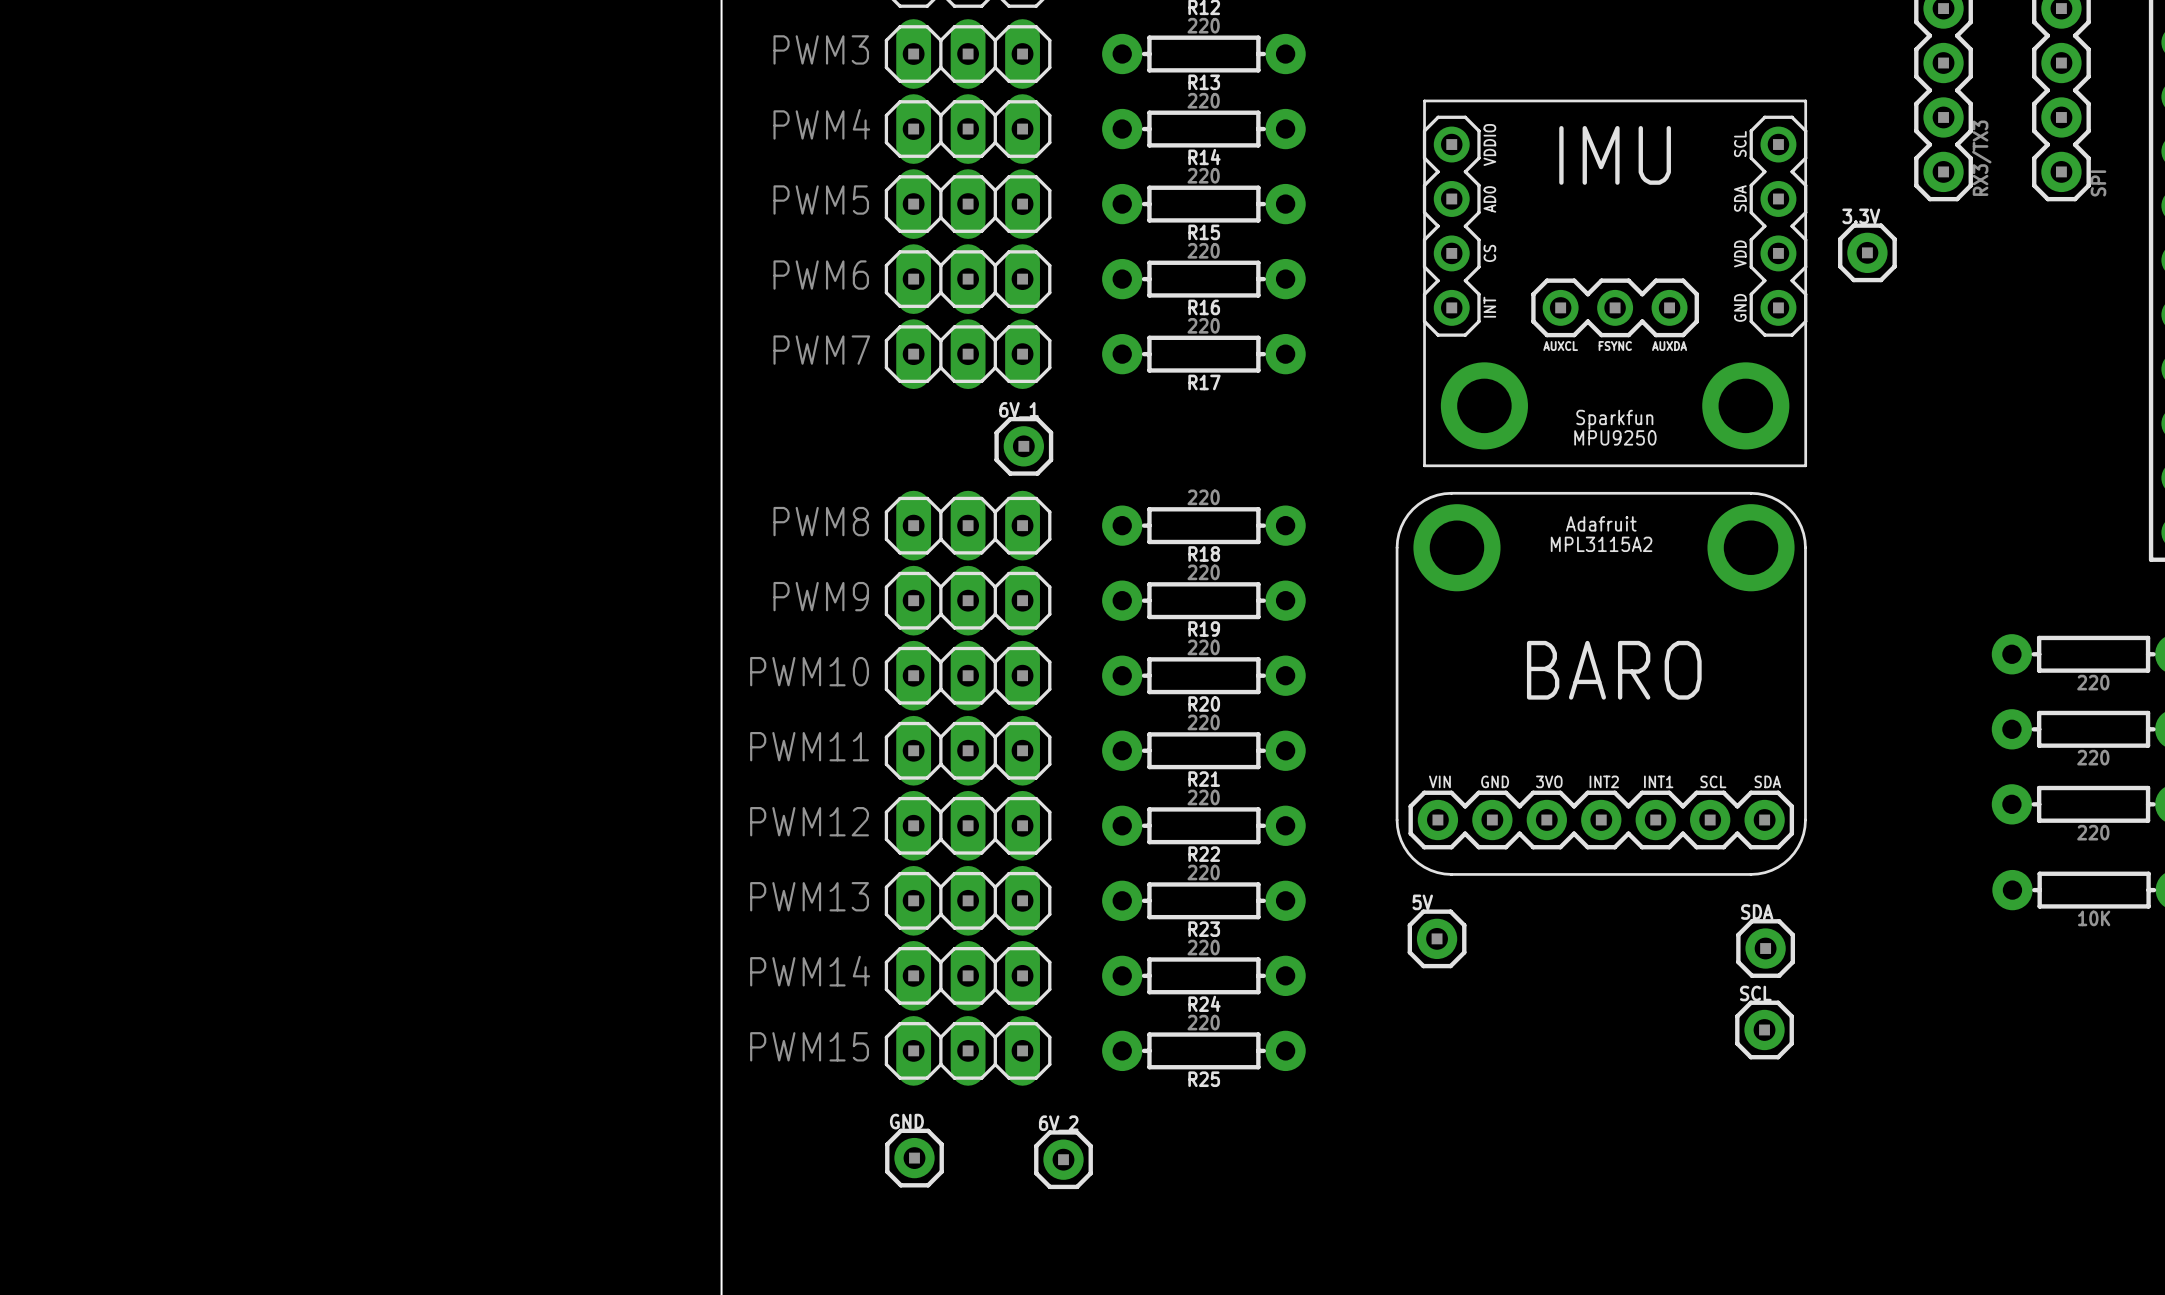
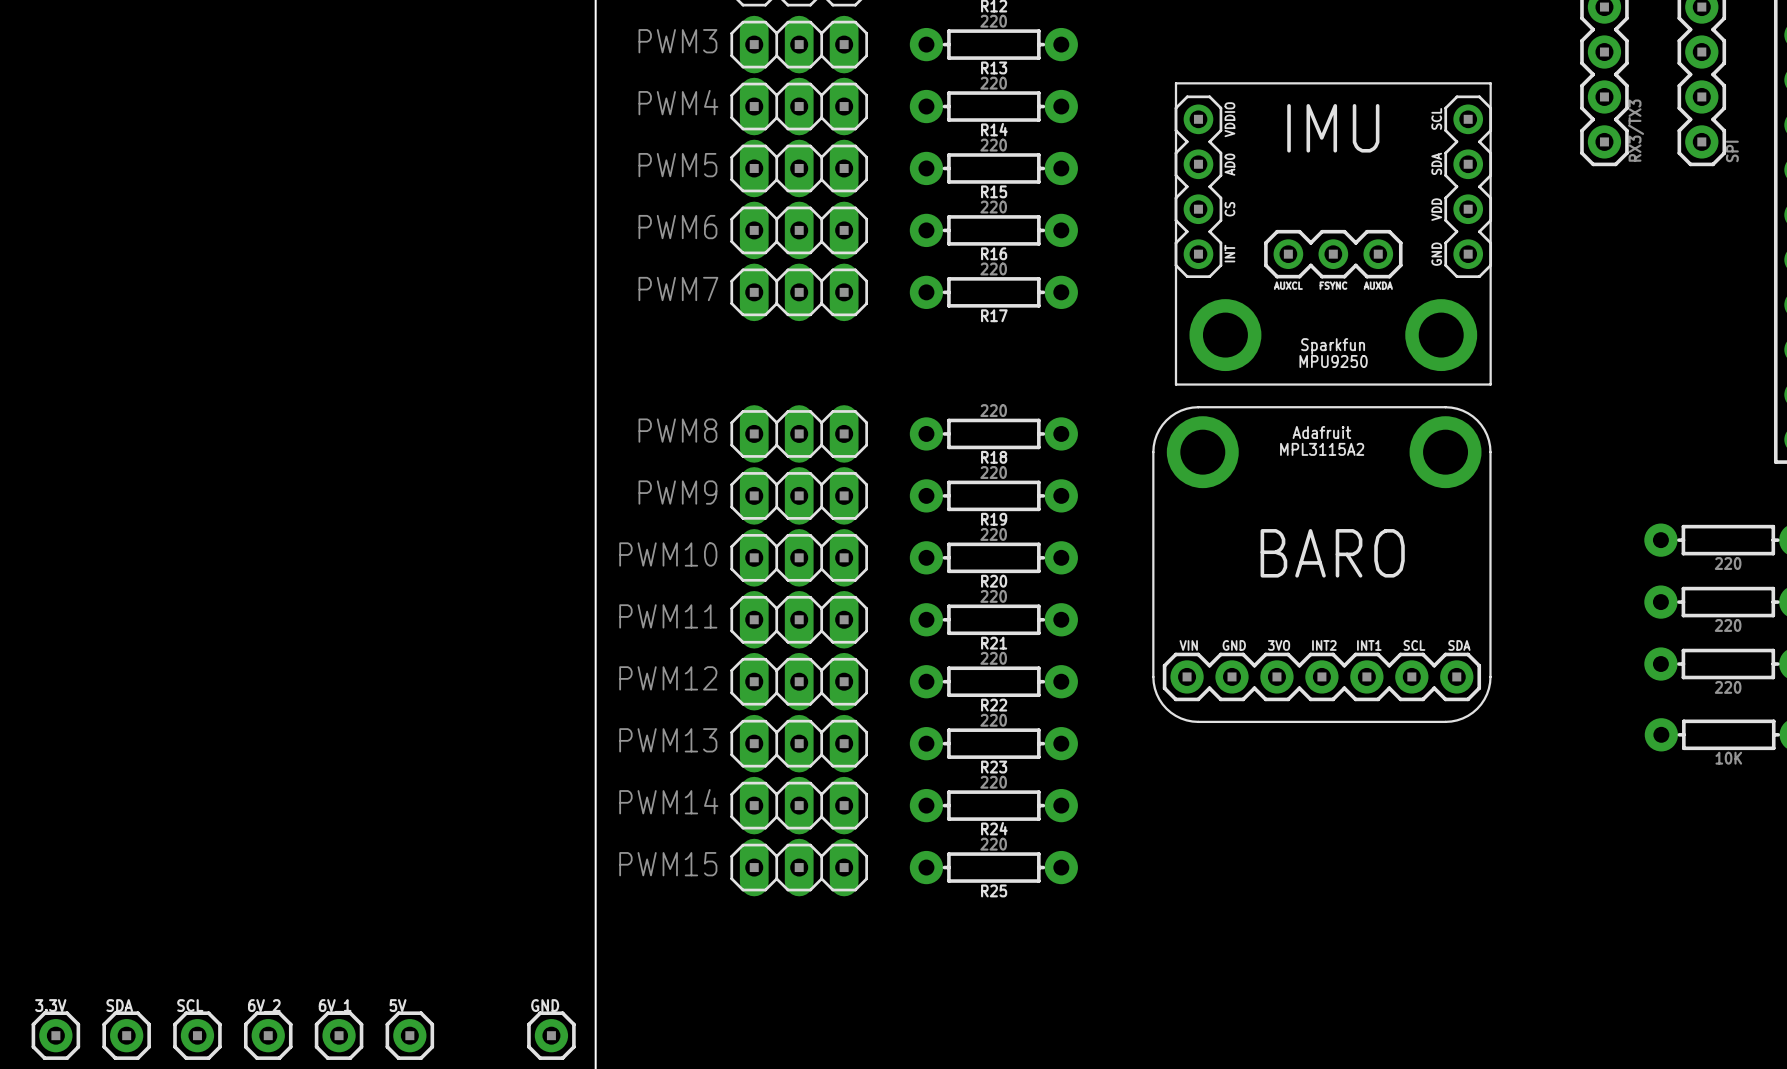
3.3V position: (1867, 252) -> (55, 1035)
6V_1 position: (1023, 446) -> (339, 1035)
5V position: (1437, 938) -> (409, 1035)
SDA: (1765, 948) -> none
SCL: (1764, 1029) -> none
GND position: (914, 1158) -> (551, 1035)
6V_2 position: (1063, 1159) -> (268, 1035)
SDA: none -> (126, 1035)
SCL: none -> (197, 1035)

